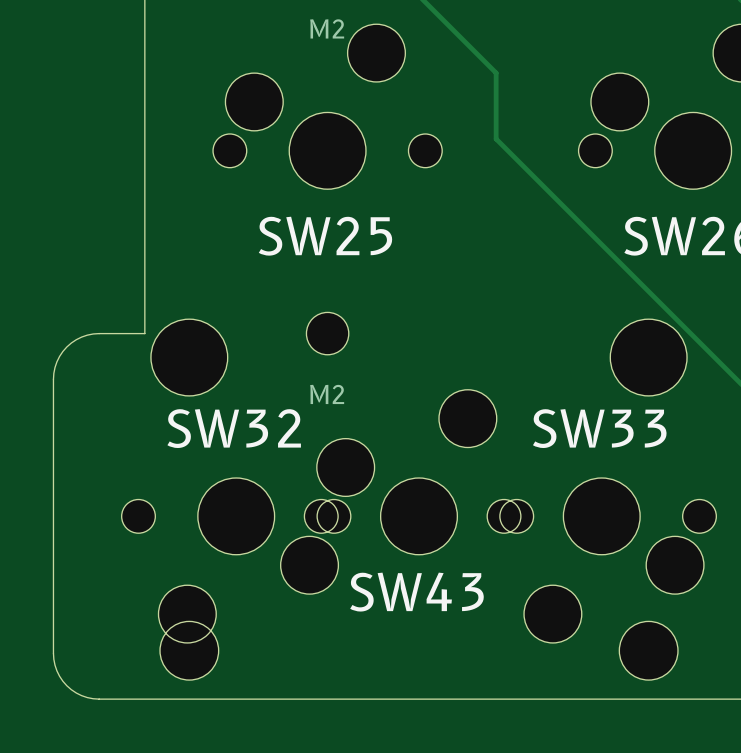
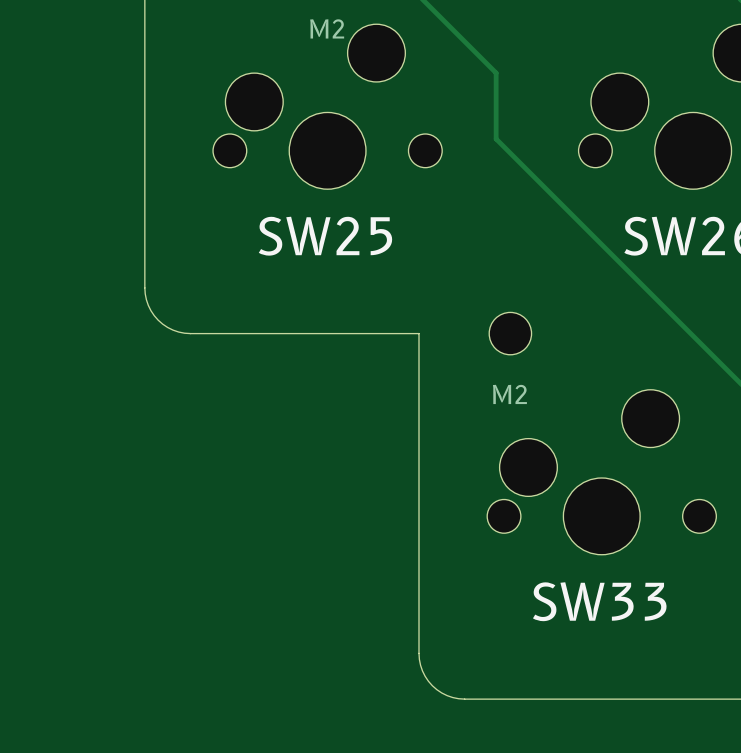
board edge: (144, 287) (144, 333) (99, 333) (81, 337) (71, 343) (62, 351) (55, 367) (53, 653) (55, 665) (62, 681) (71, 689) (81, 695) (99, 699) (464, 699) -> (144, 287) (146, 299) (154, 315) (167, 327) (184, 333) (418, 333) (419, 659) (425, 676) (436, 689) (447, 695) (464, 699)
part position: (327, 333) -> (510, 333)
SW43: (418, 499) -> none
SW32: (236, 560) -> none
SW33 rotation: 0° (601, 560) -> 180° (601, 472)

